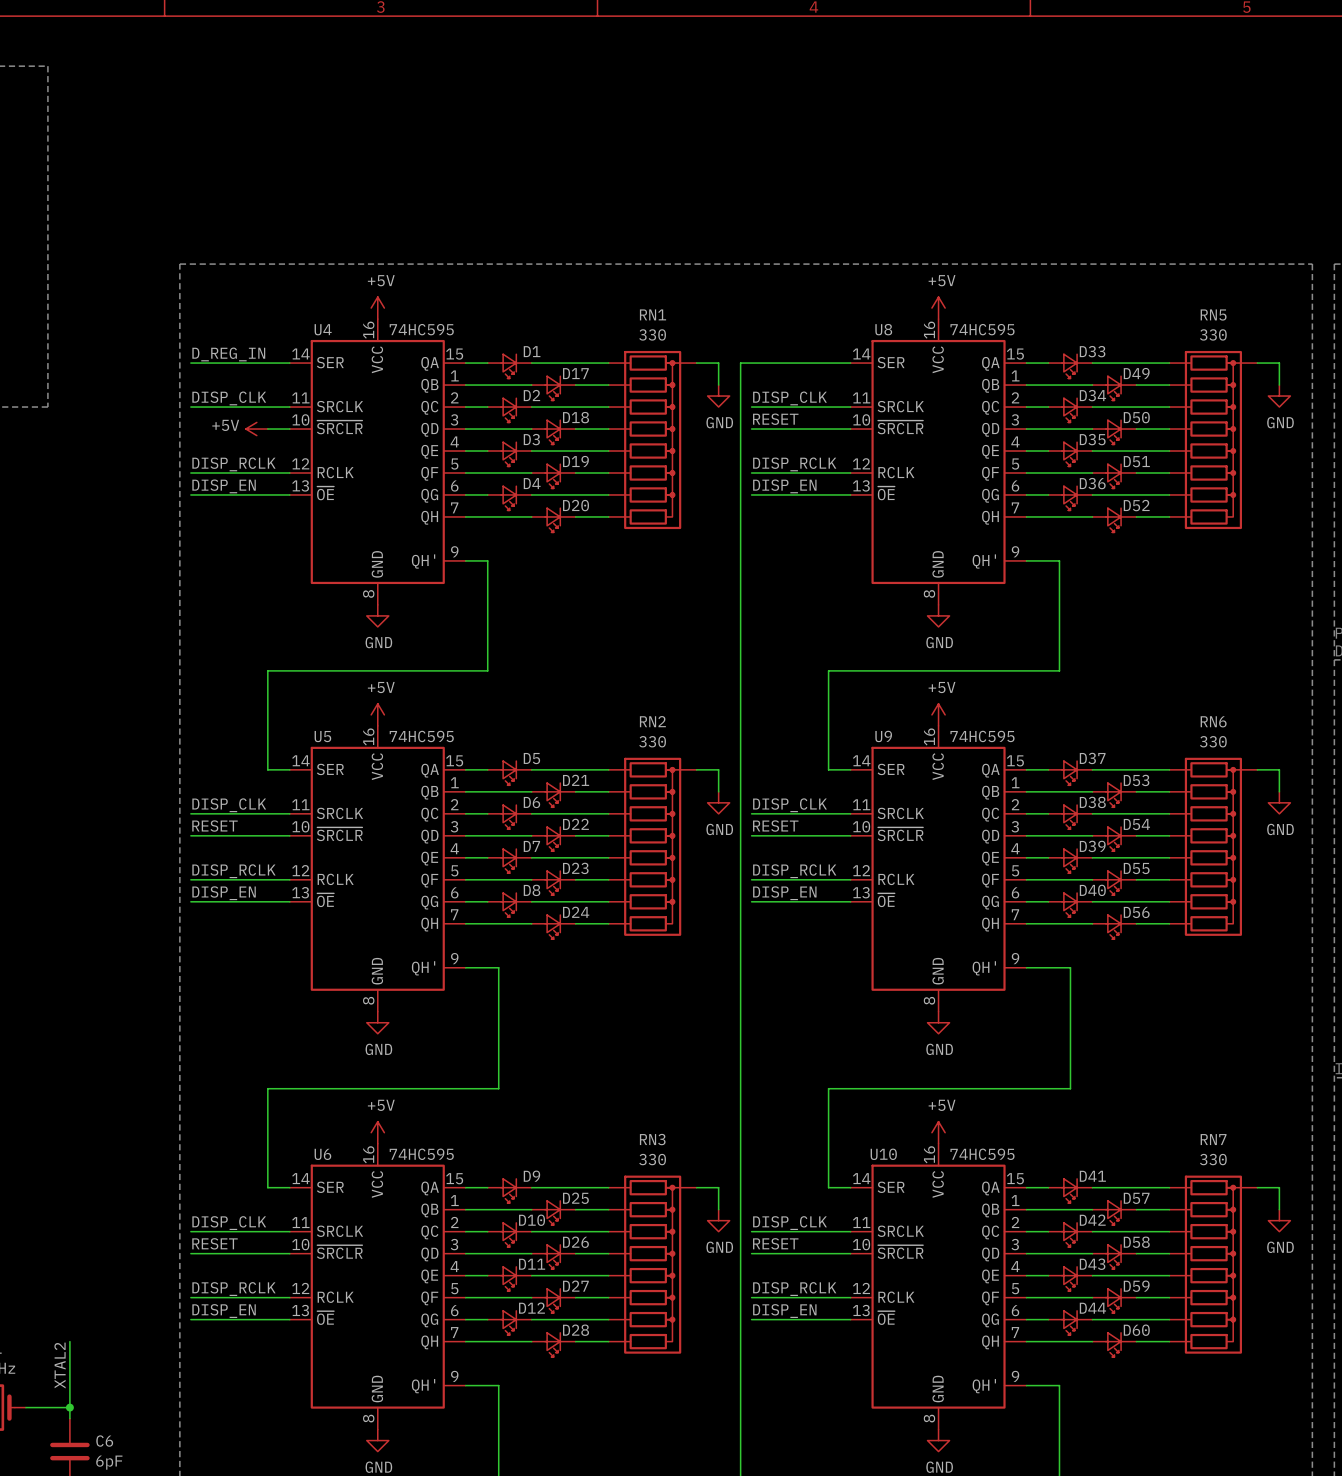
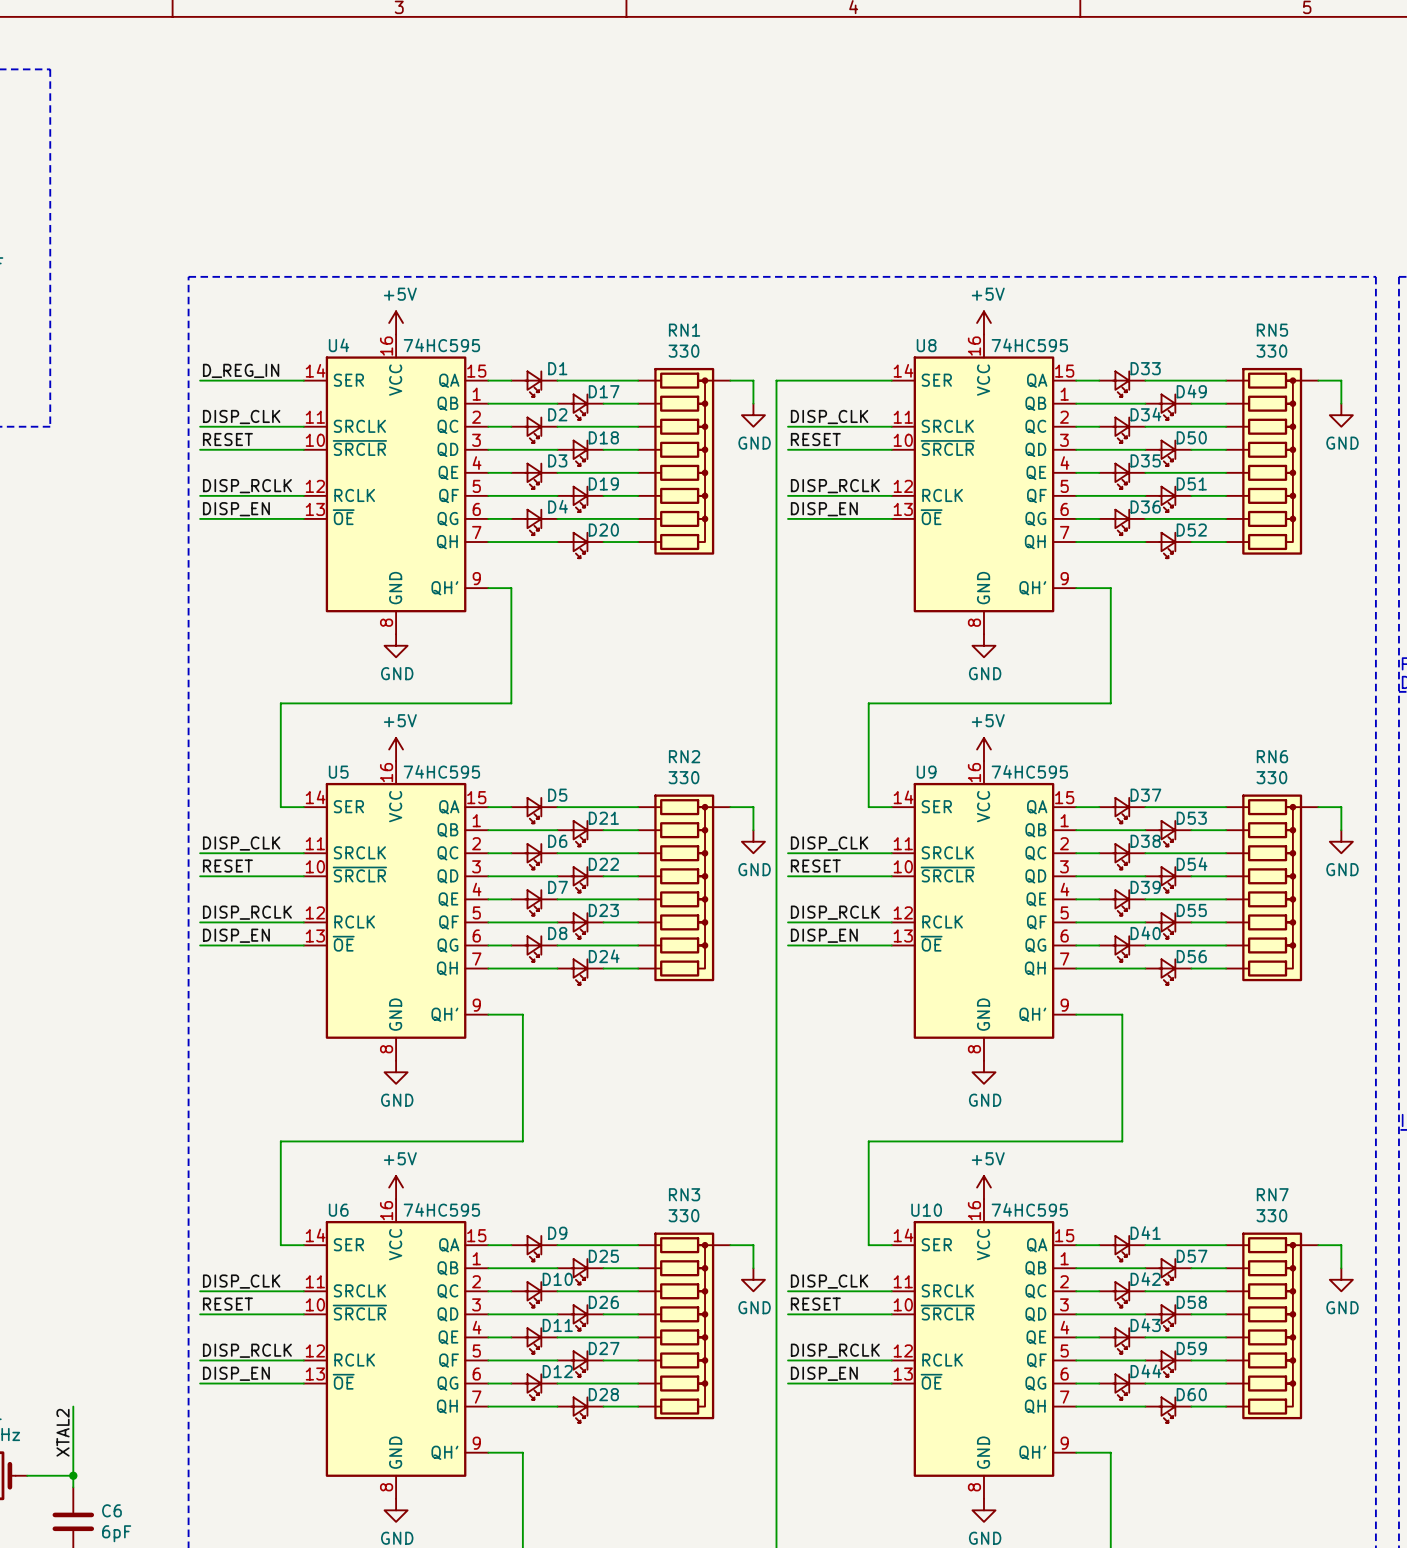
label: none -> RESET (227, 439)
wire: none -> (200, 449) (280, 449)
power symbol: +5V (256, 429) -> none

